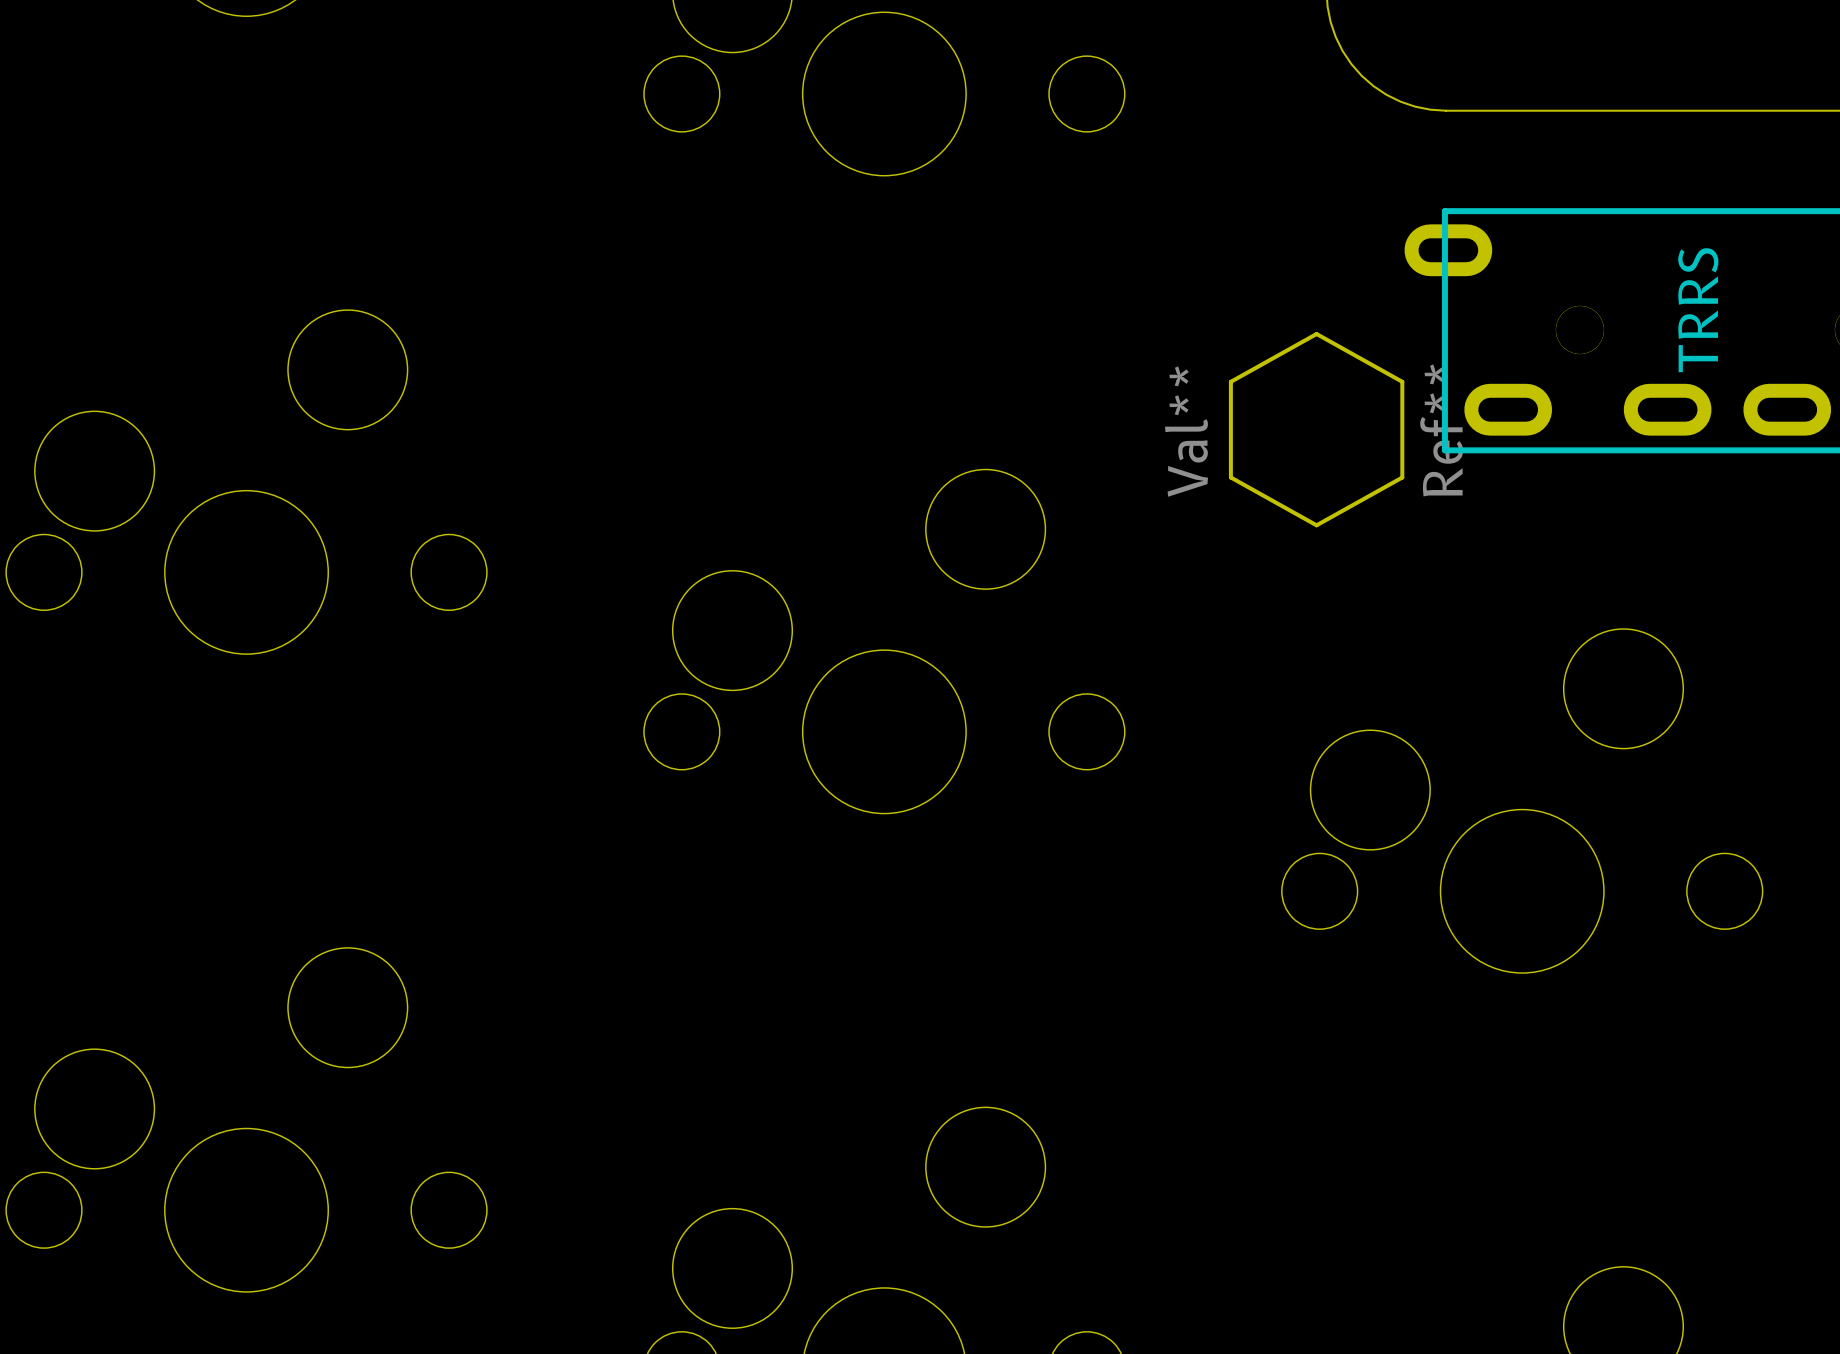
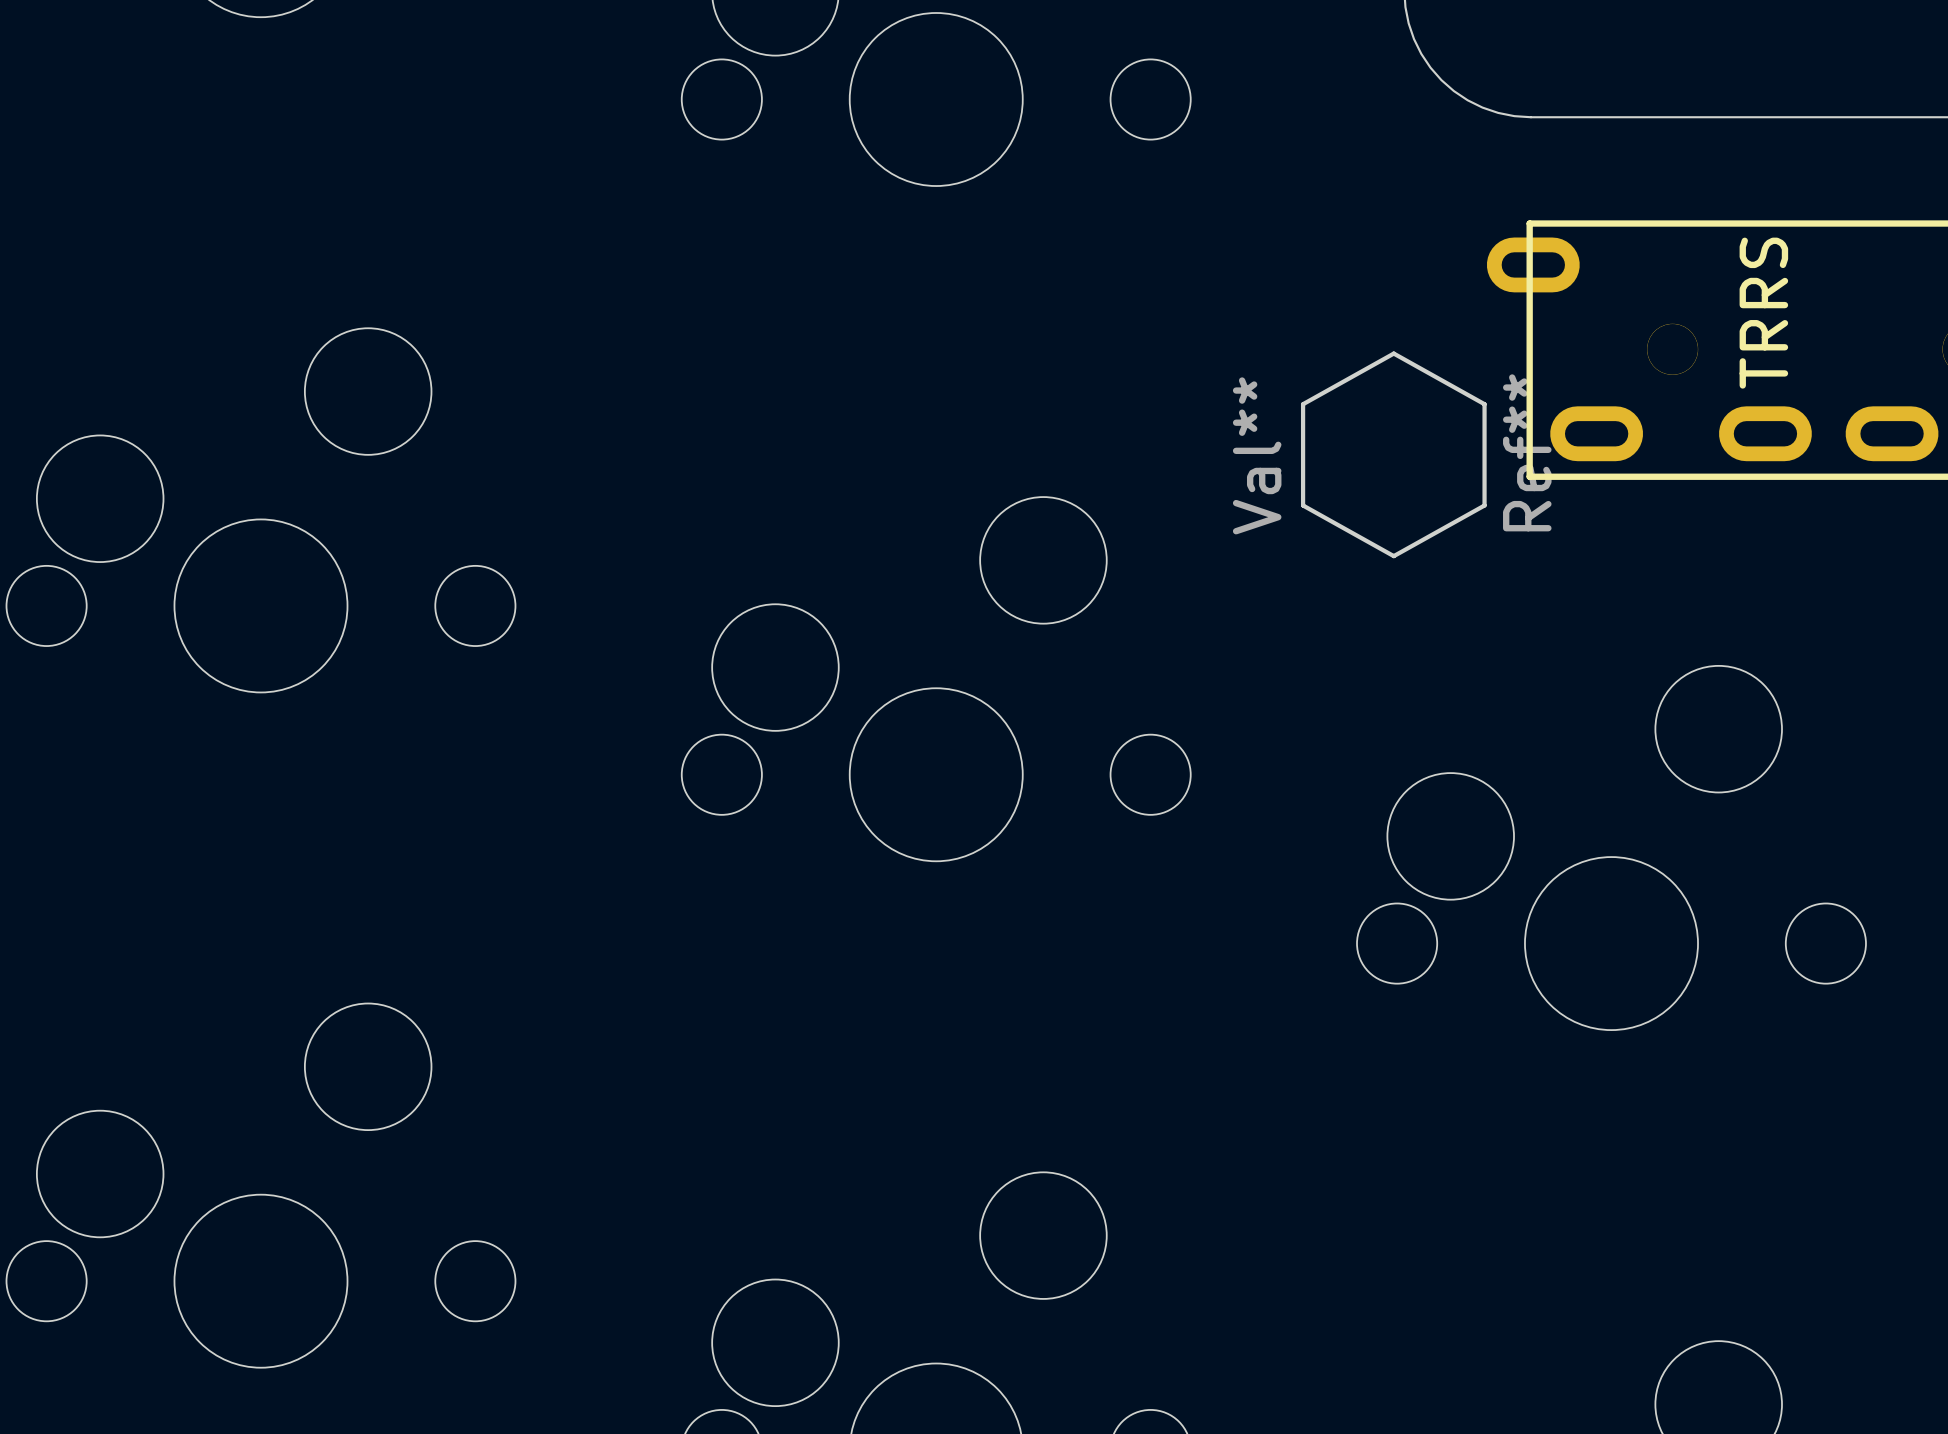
part text position: TRRS (1698, 310) -> TRRS (1763, 313)

